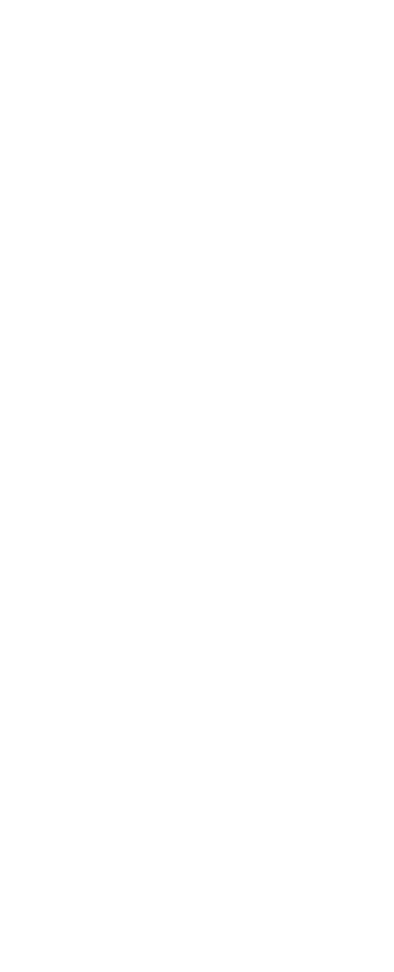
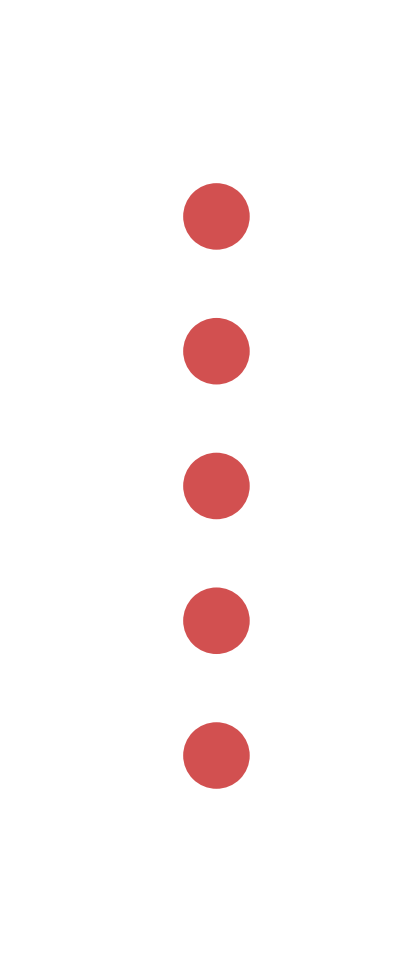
part: none -> (216, 216)
part: none -> (216, 351)
part: none -> (216, 485)
part: none -> (216, 620)
part: none -> (216, 755)

